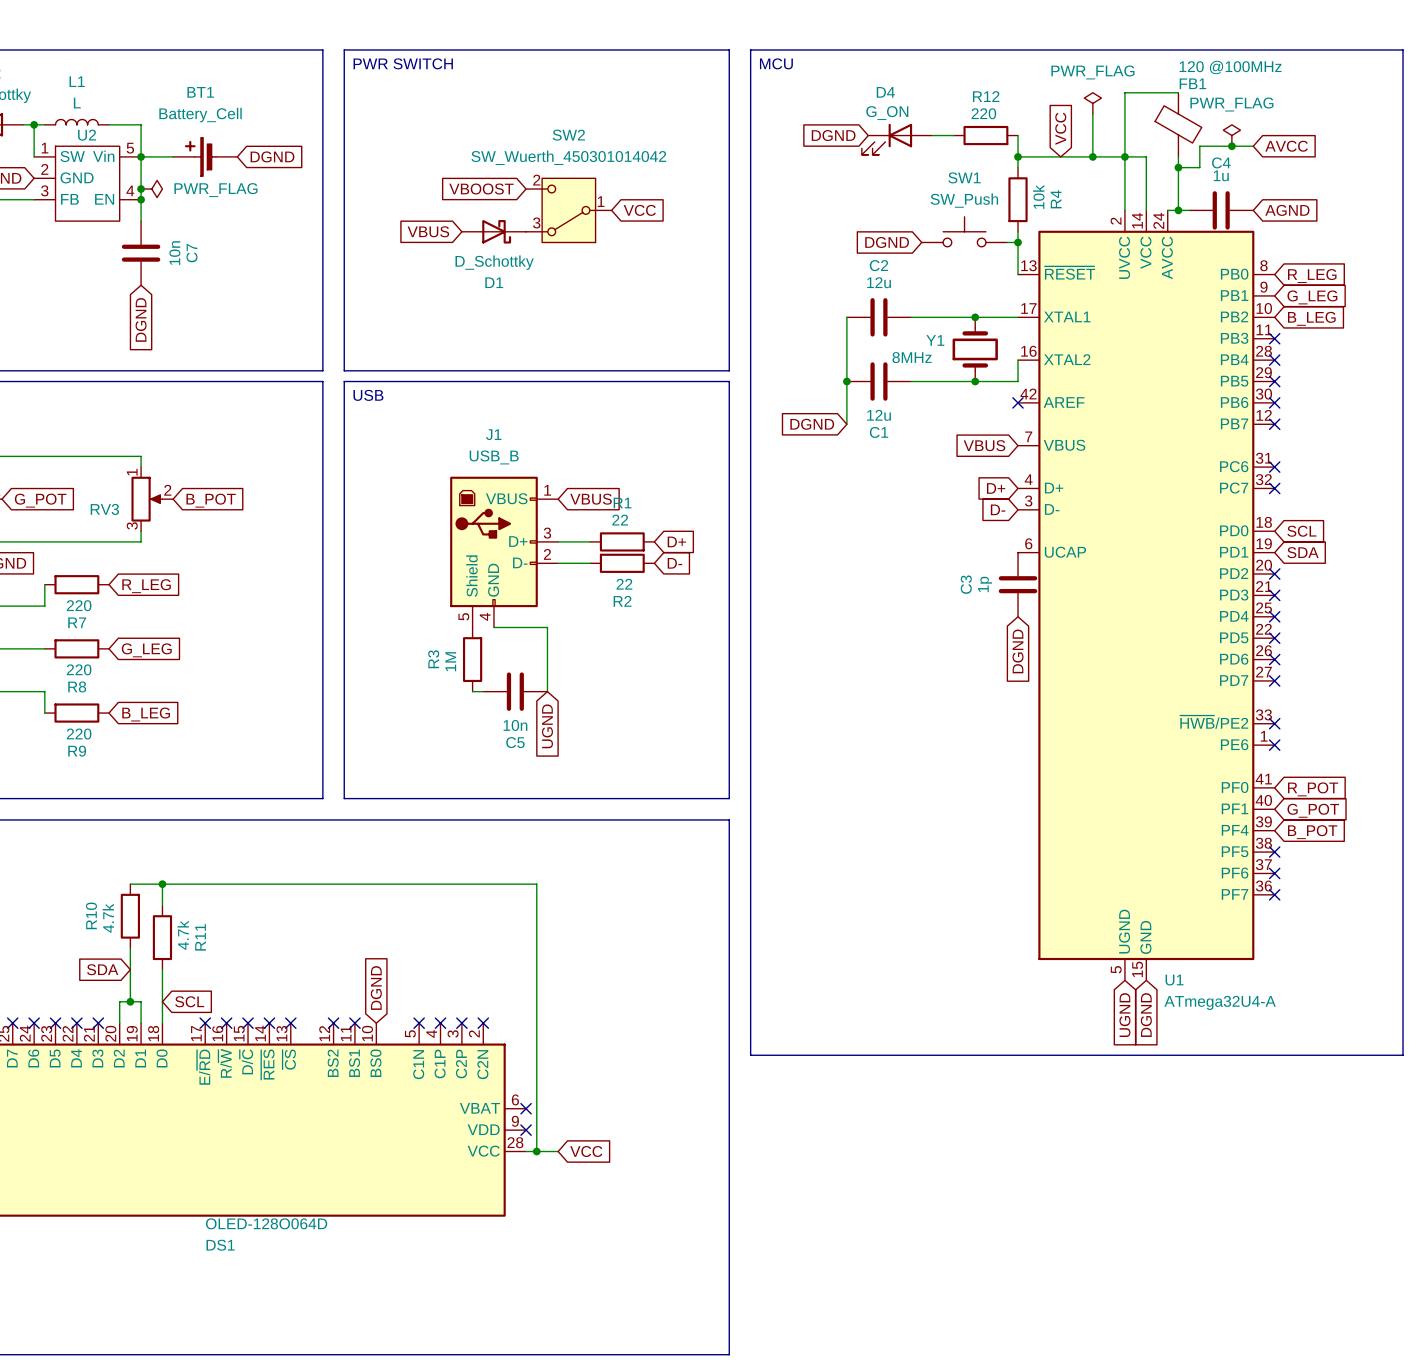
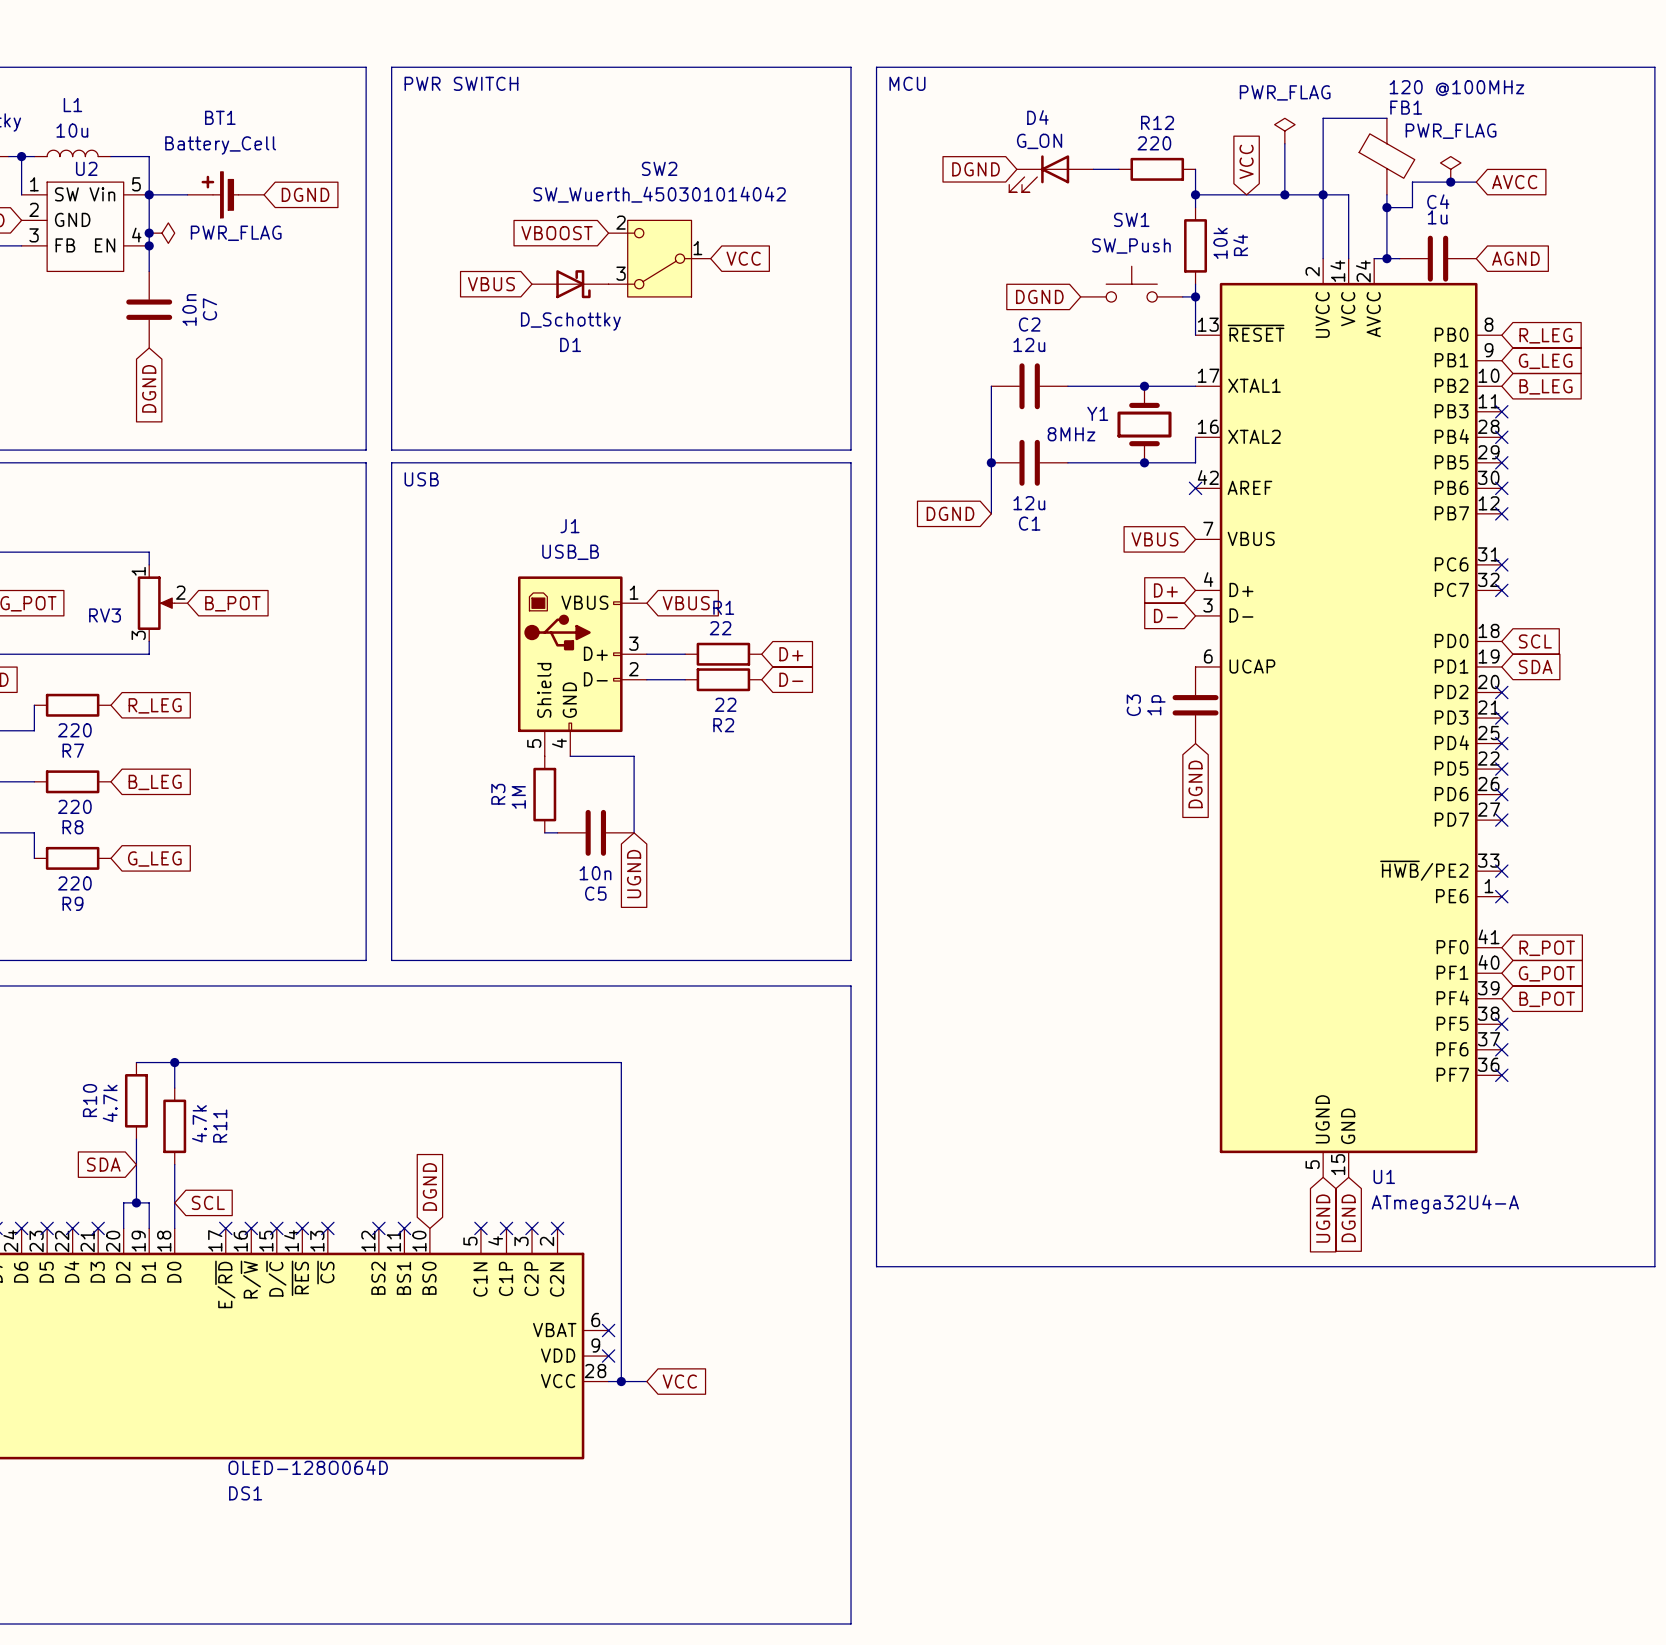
L1 value: L (77, 103) -> 10u (72, 130)
global label: G_LEG (146, 650) -> B_LEG (155, 782)
global label: B_LEG (146, 714) -> G_LEG (154, 858)

